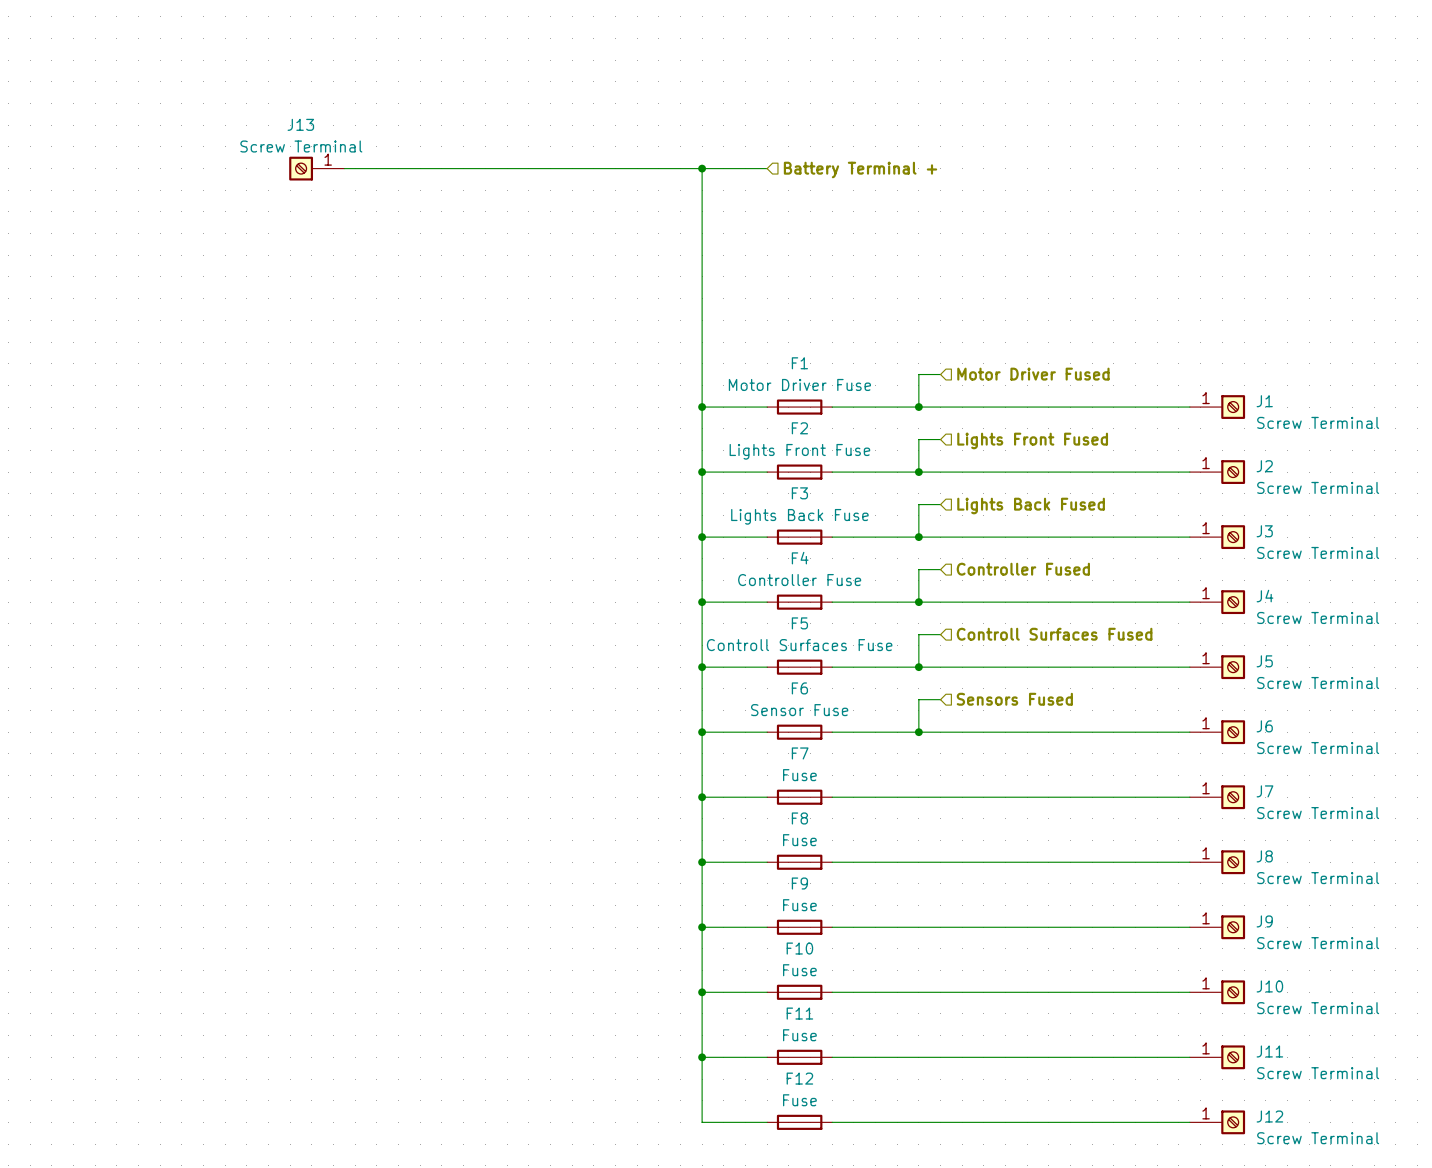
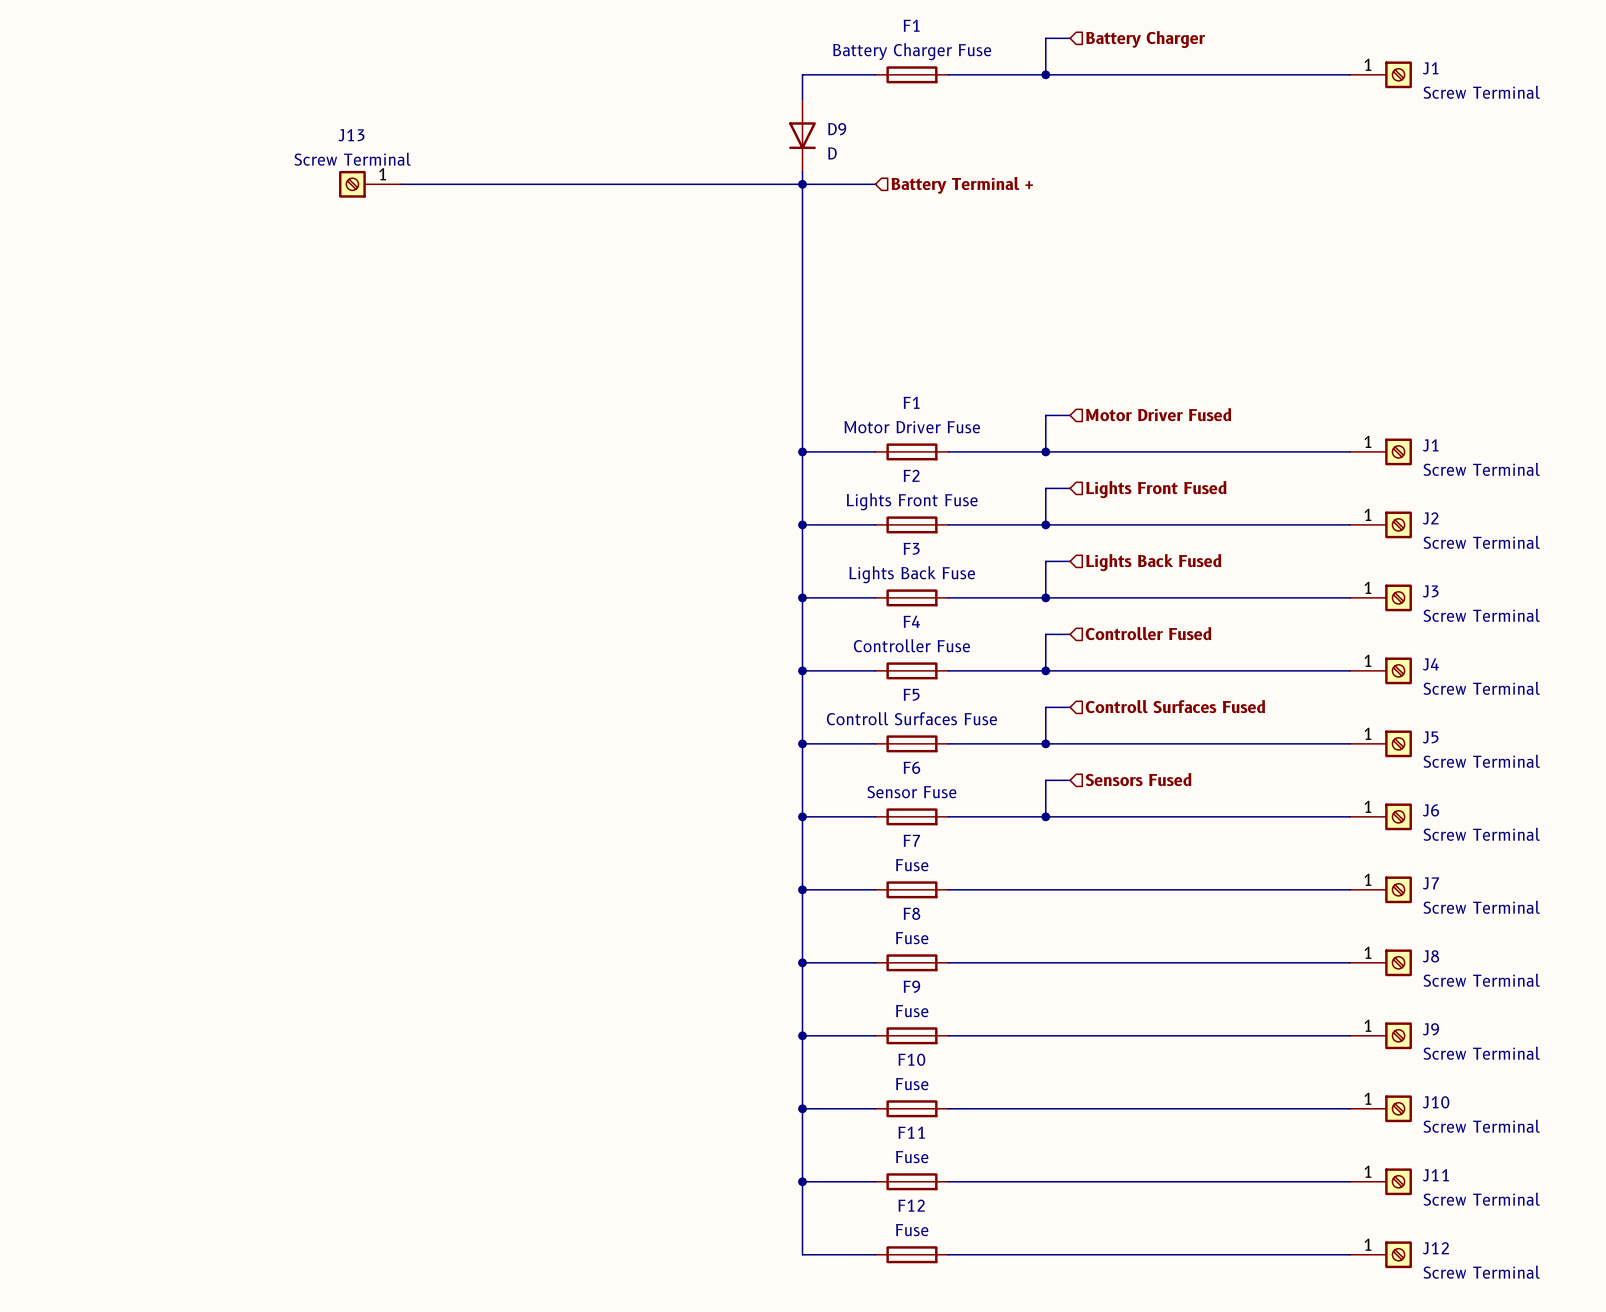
wire: none -> (1070, 38) (1045, 38) (1045, 74)
hierarchical label: none -> Battery Charger (1145, 39)
wire: none -> (875, 74) (802, 74) (802, 99)
F1: none -> Battery Charger Fuse (911, 74)
wire: none -> (948, 74) (1349, 74)
junction: none -> (1045, 74)
J1: none -> Screw Terminal (1380, 74)
D9: none -> D (802, 135)
wire: none -> (802, 172) (802, 184)

